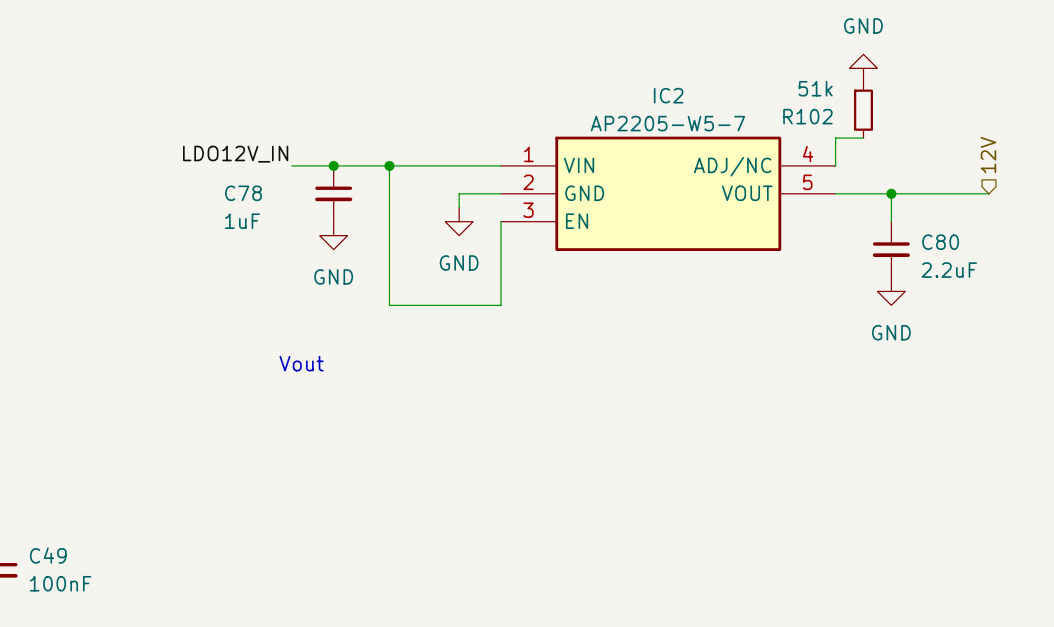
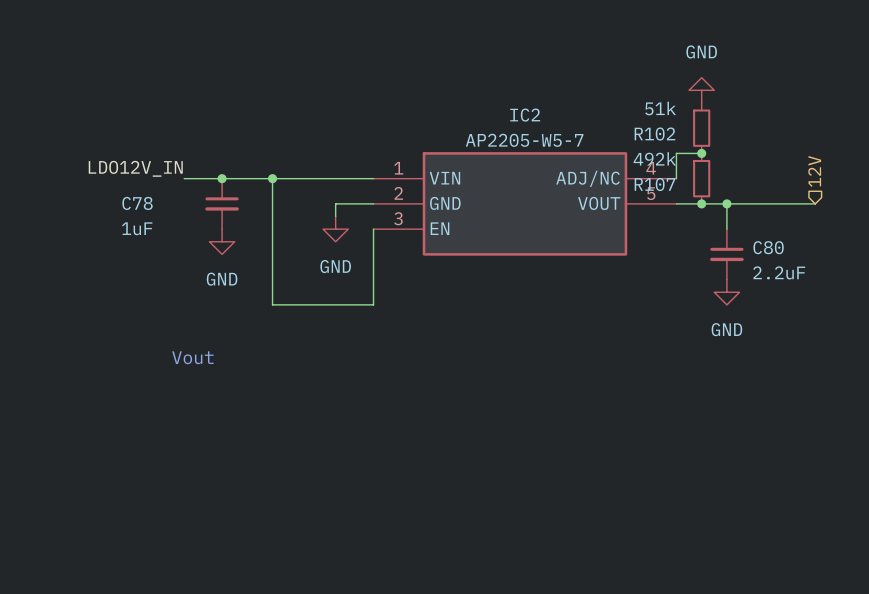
junction: none -> (701, 153)
R107: none -> 492k (701, 178)
junction: none -> (701, 203)

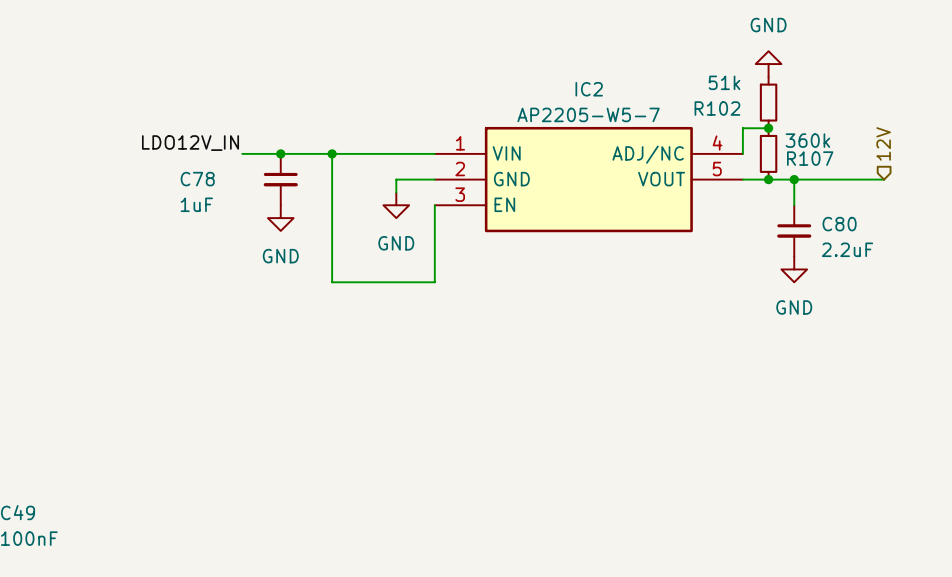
R107 value: 492k (654, 158) -> 360k (807, 140)
R107 name position: R107 (654, 184) -> R107 (810, 158)
text: Vout (192, 357) -> none

